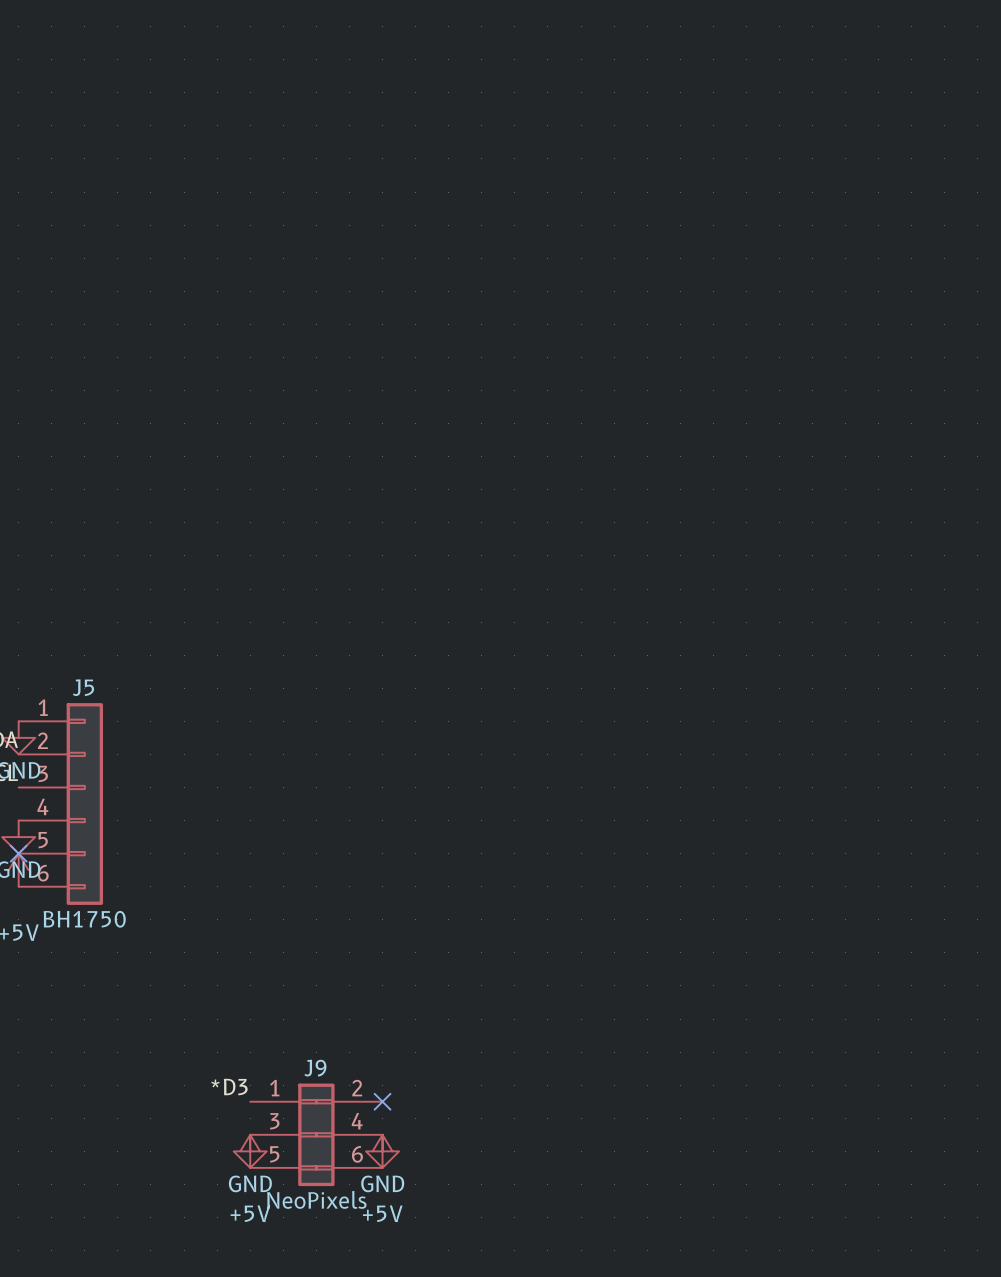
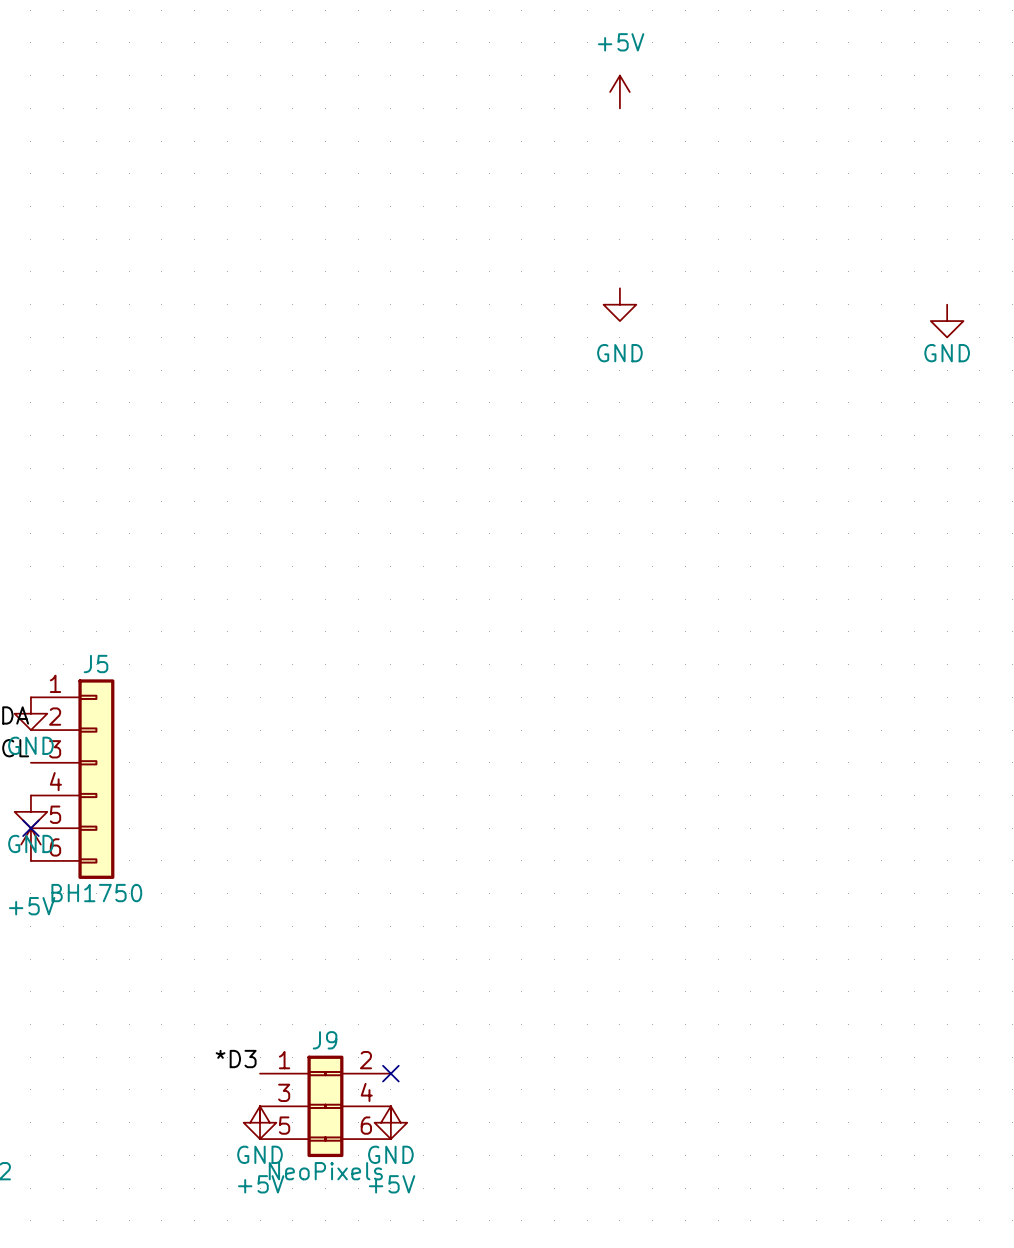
power symbol: none -> +5V (619, 92)
power symbol: none -> GND (619, 304)
power symbol: none -> GND (947, 321)

